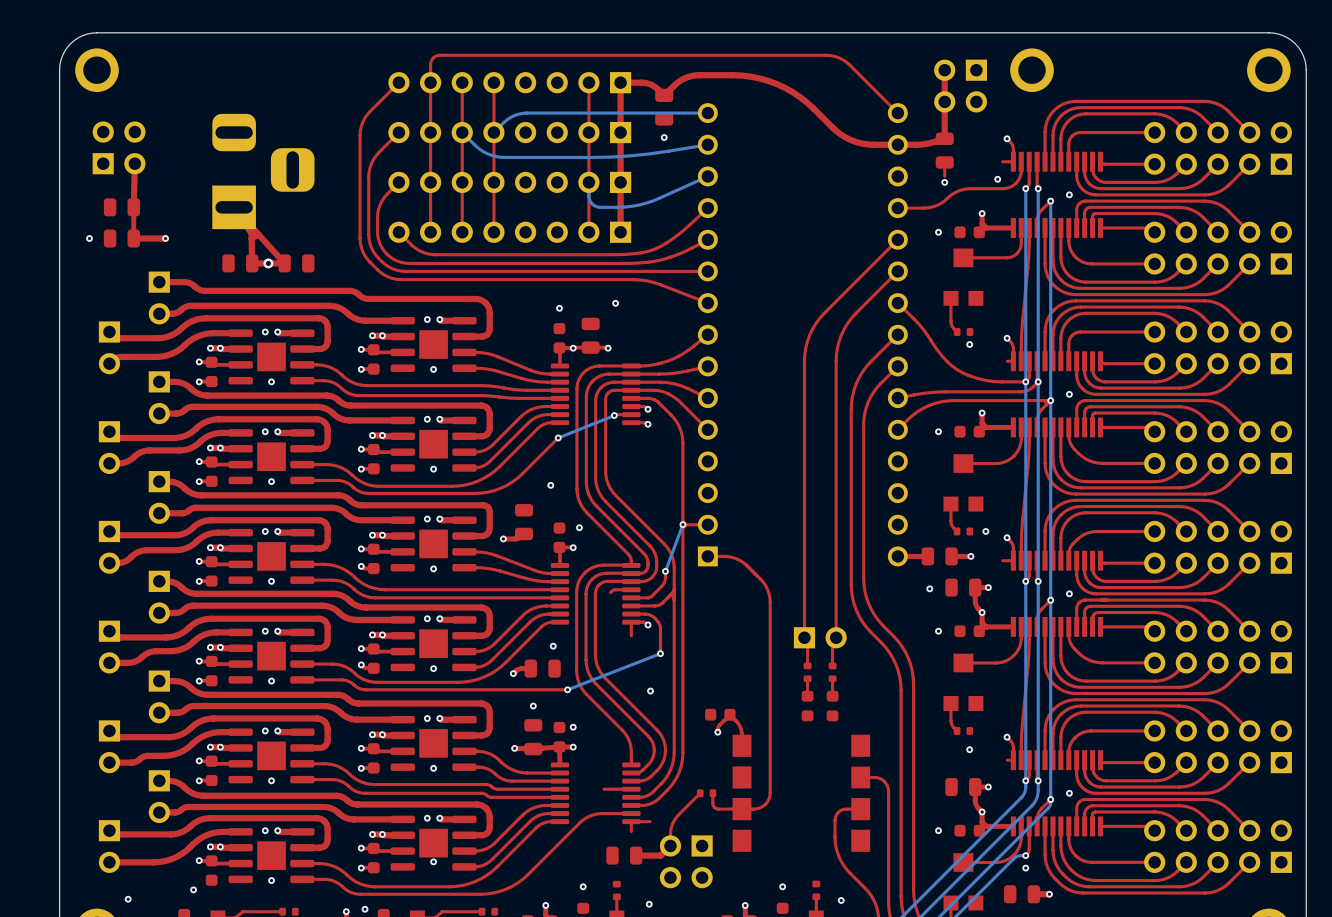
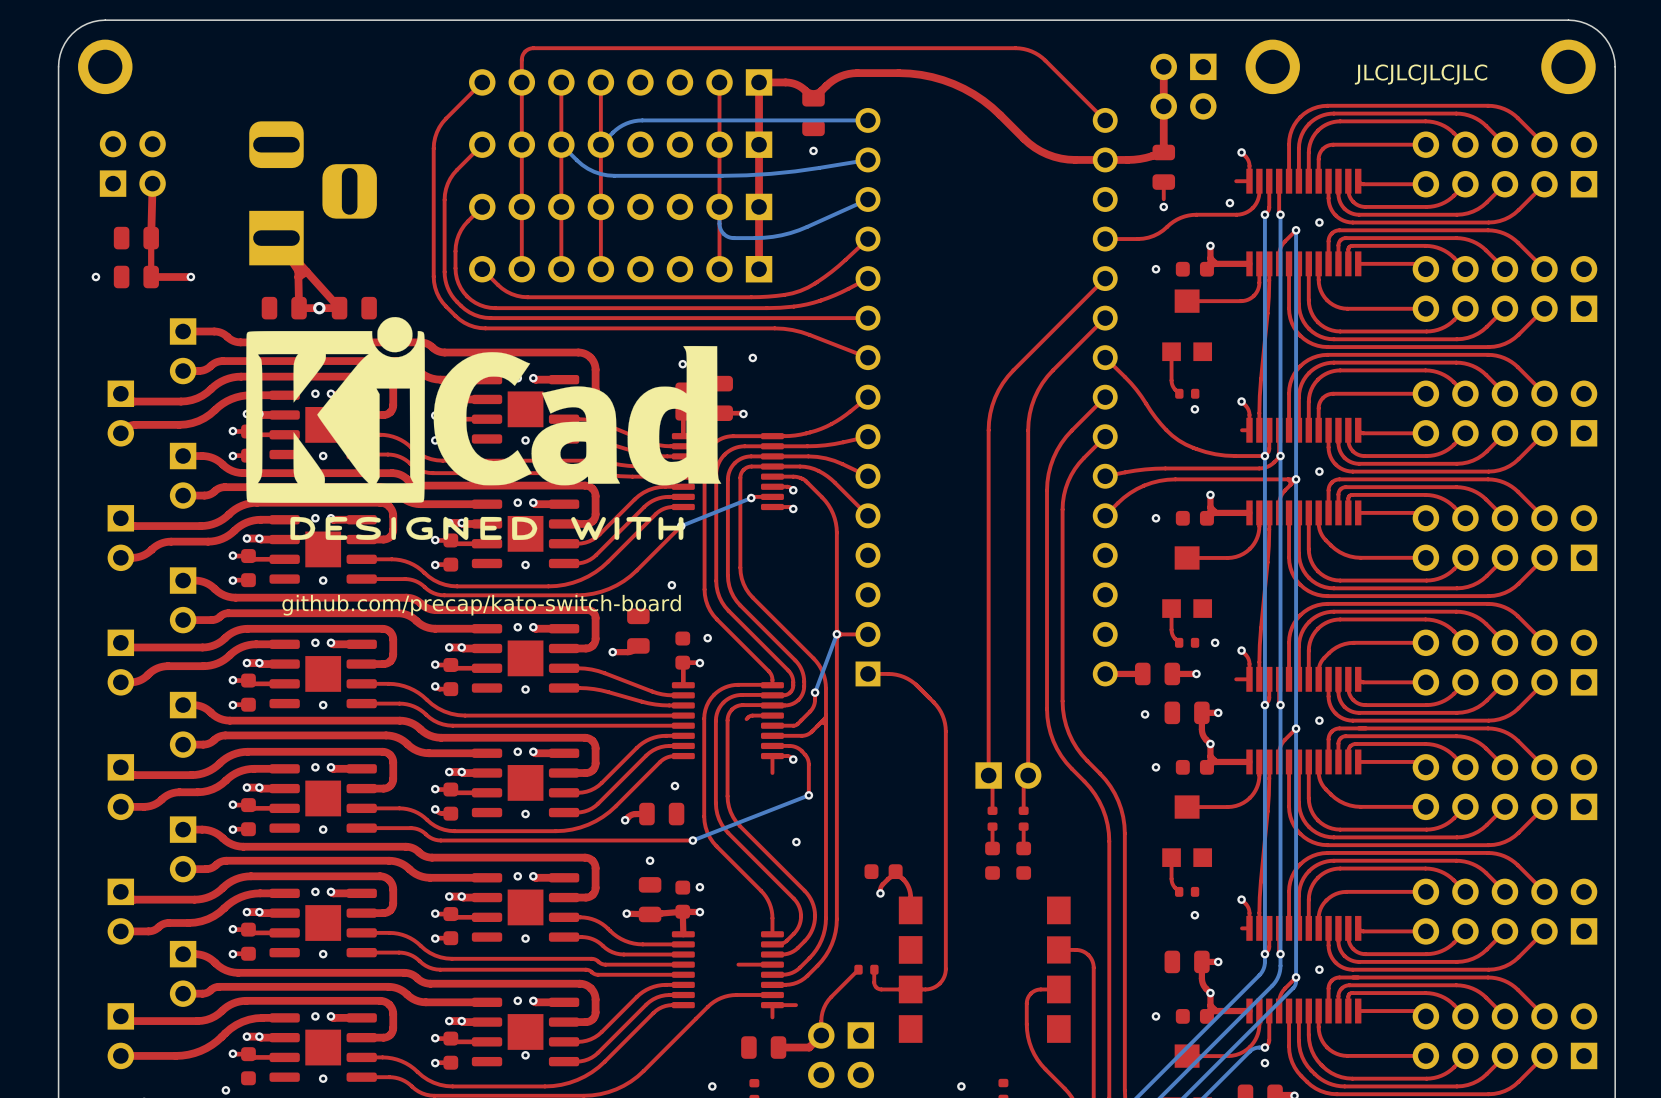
text: none -> JLCJLCJLCJLC (1421, 74)
drawing: none -> [246, 317, 722, 541]
text: none -> github.com/precap/kato-switch-board (481, 605)

